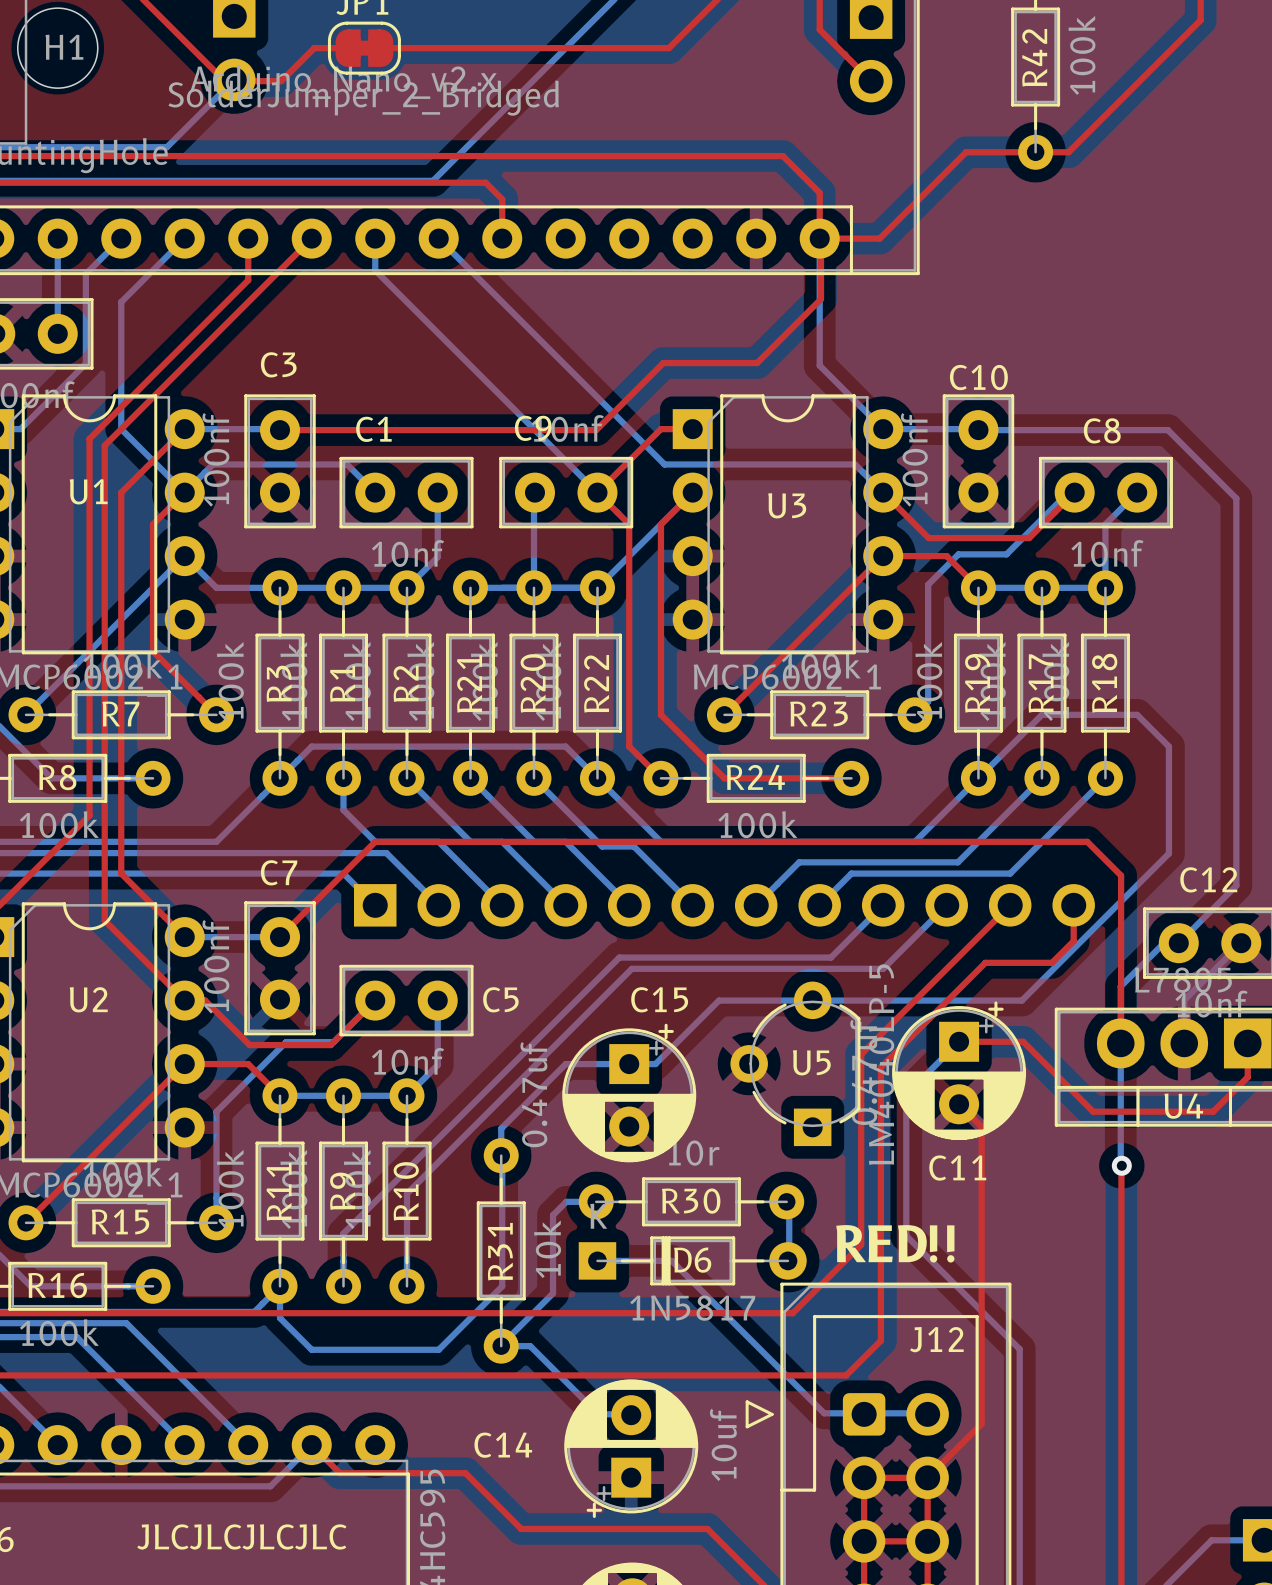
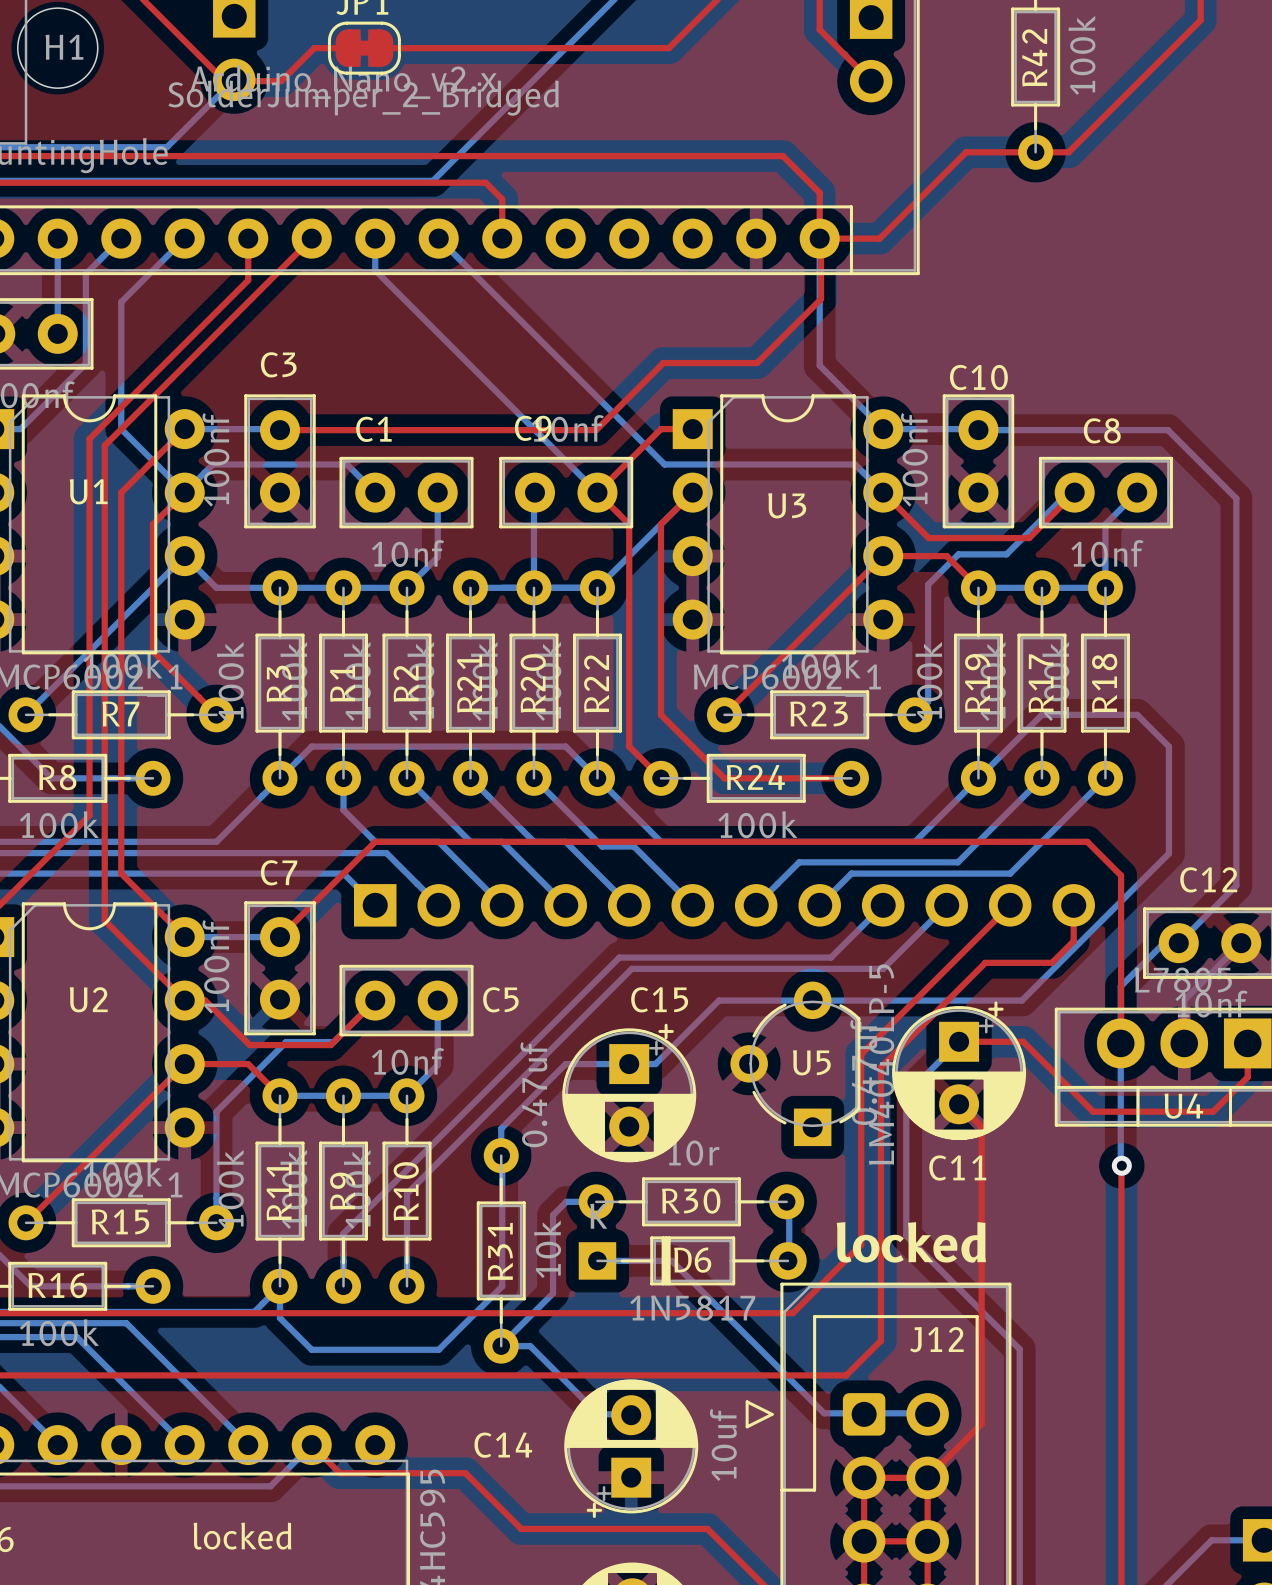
text: RED!! (895, 1243) -> locked (911, 1242)
text: JLCJLCJLCJLC (241, 1536) -> locked (242, 1536)

